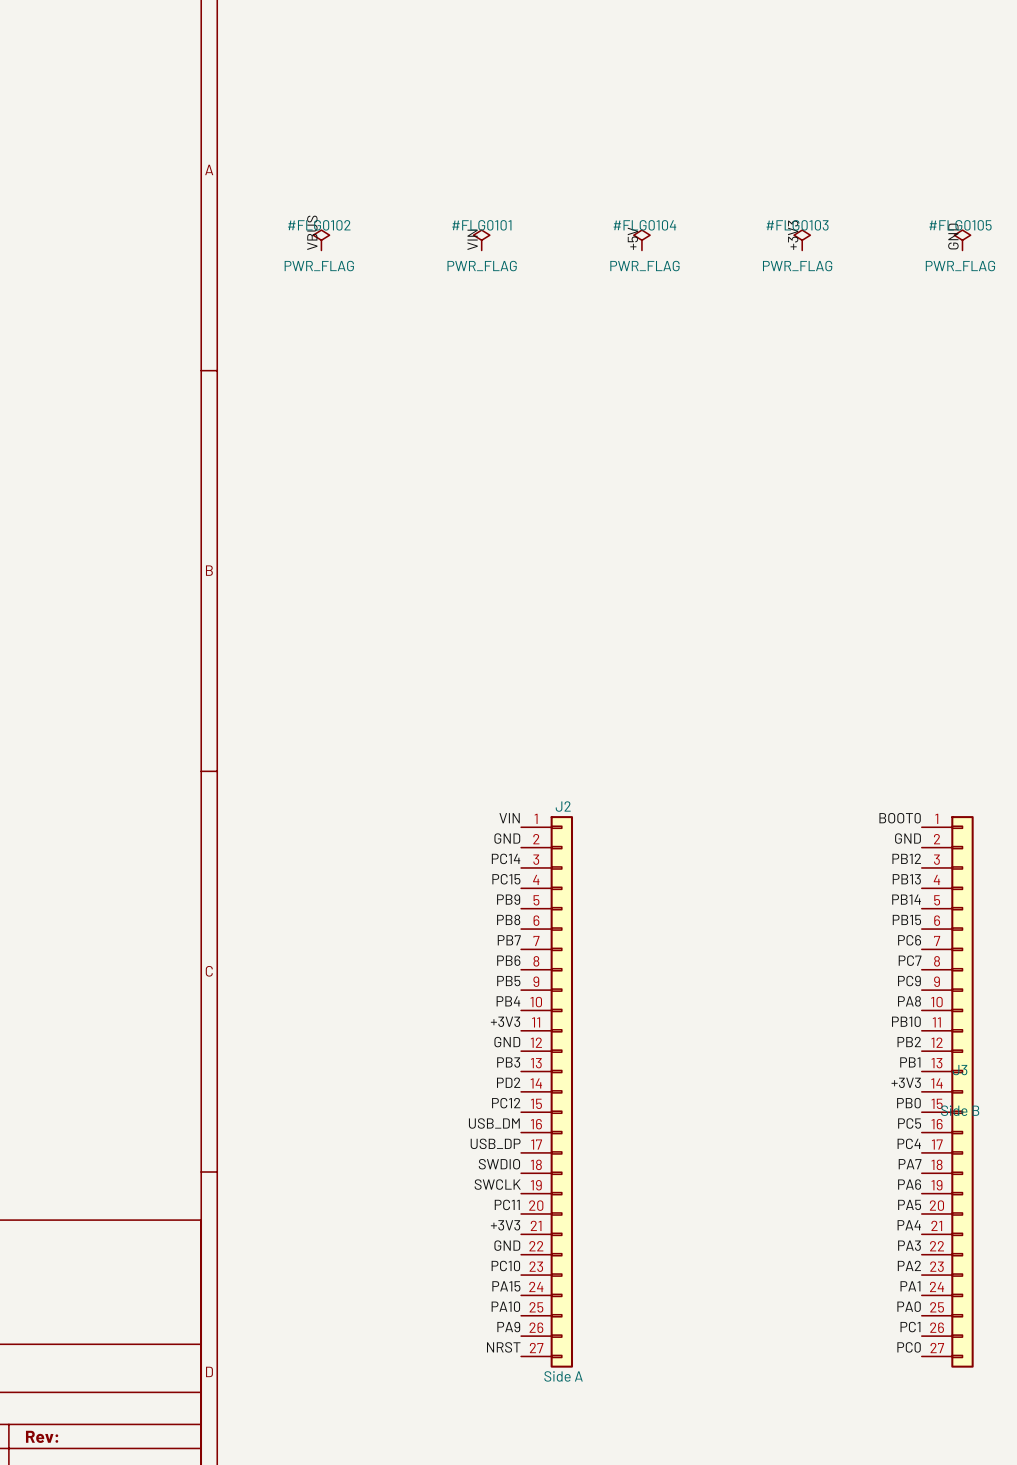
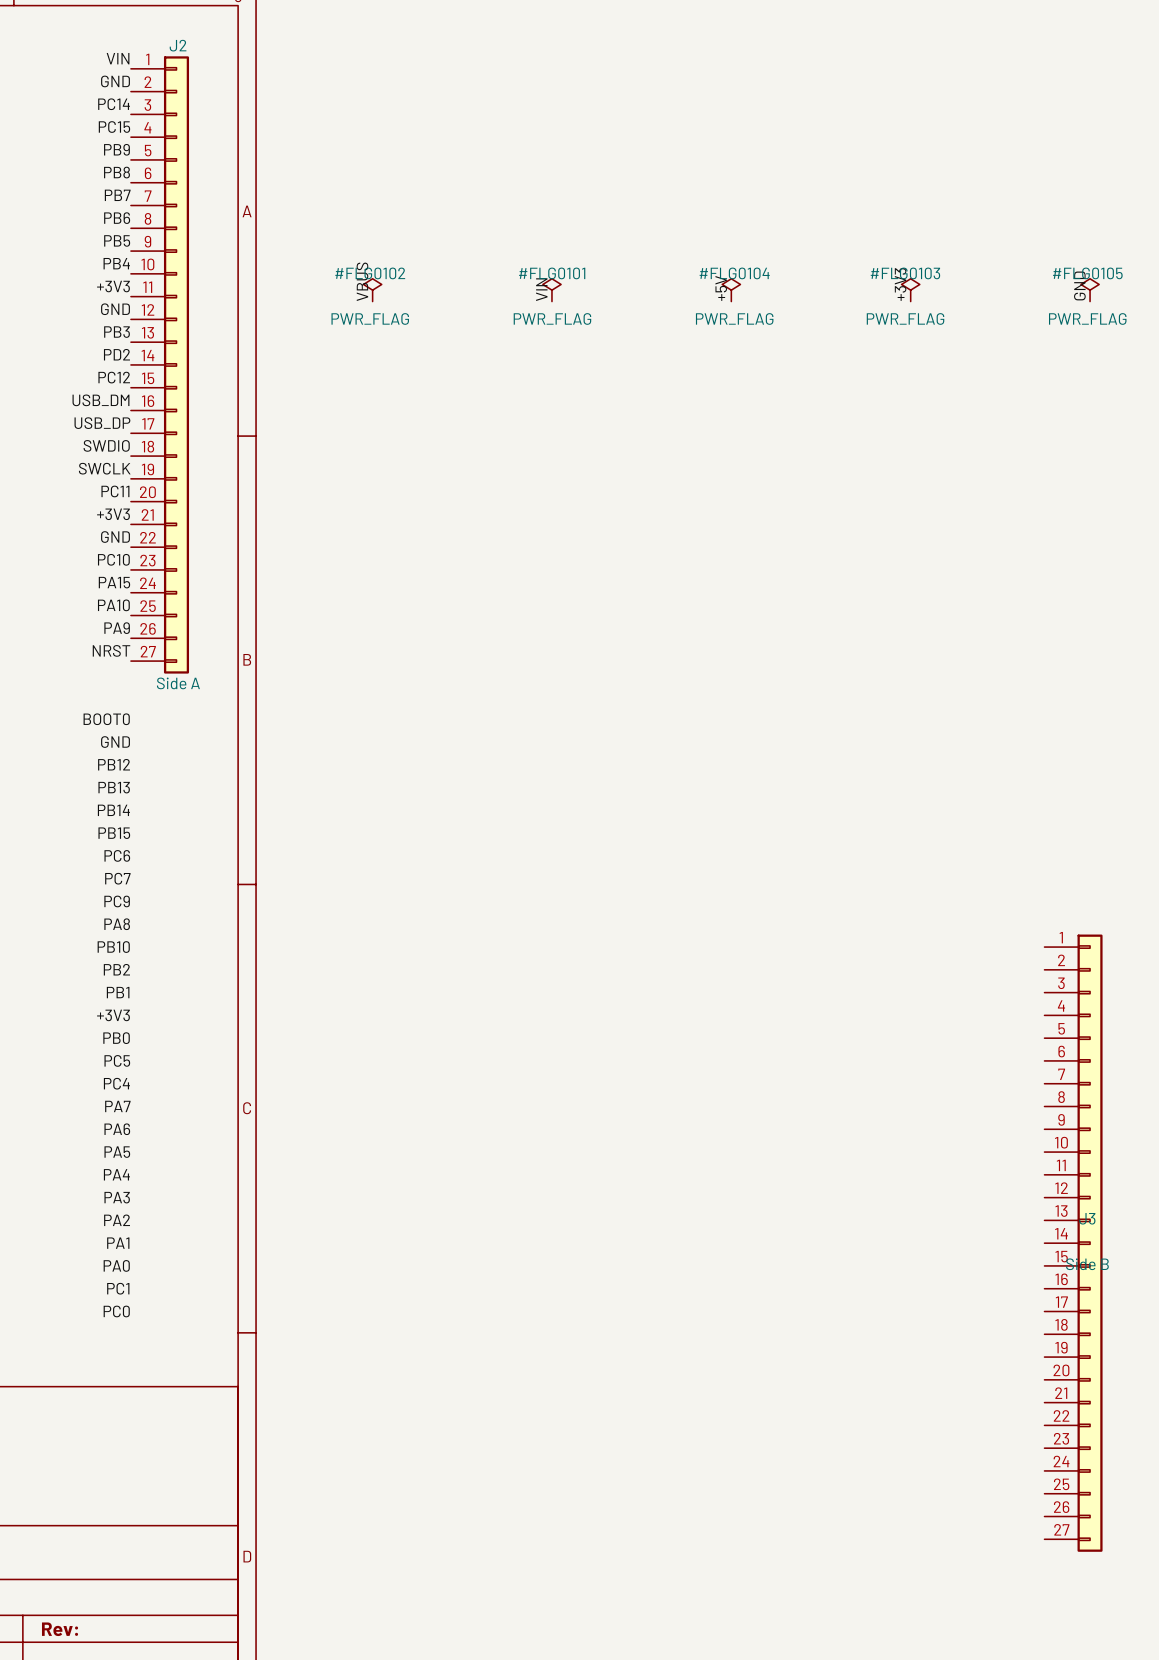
label: none -> VIN (118, 58)
label: none -> GND (115, 81)
label: none -> PC14 (114, 104)
label: none -> PC15 (114, 127)
label: none -> PB9 (116, 149)
label: none -> PB8 (116, 172)
label: none -> PB7 (117, 195)
label: none -> PB6 (117, 218)
label: none -> PB5 (117, 240)
label: none -> PB4 (116, 263)
label: none -> +3V3 (113, 286)
label: none -> GND (115, 309)
label: none -> PB3 (117, 332)
label: none -> PD2 (116, 354)
label: none -> PC12 (114, 377)
label: none -> USB_DM (100, 400)
label: none -> USB_DP (102, 423)
label: none -> SWDIO (106, 445)
label: none -> SWCLK (104, 468)
label: none -> PC11 (115, 491)
label: none -> +3V3 (113, 514)
label: none -> GND (115, 537)
label: none -> PC10 (113, 559)
label: none -> PA15 (114, 582)
label: none -> PA10 (113, 605)
label: none -> PA9 (117, 628)
label: none -> NRST (111, 650)
label: none -> BOOT0 (106, 719)
label: none -> GND (115, 742)
label: none -> PB12 (114, 764)
label: none -> PB13 (114, 787)
label: none -> PB14 (113, 810)
label: none -> PB15 (114, 833)
label: none -> PC6 (117, 855)
label: none -> PC7 (117, 878)
label: none -> PC9 (117, 901)
label: none -> PA8 (117, 924)
label: VIN (509, 818) -> none
label: BOOT0 (900, 818) -> none
label: none -> PB10 (113, 947)
label: GND (507, 838) -> none
label: GND (907, 838) -> none
label: none -> PB2 (116, 969)
label: PC14 (506, 858) -> none
label: PB12 (906, 858) -> none
label: none -> PB1 (118, 992)
label: PC15 (506, 879) -> none
label: PB13 (906, 879) -> none
label: none -> +3V3 (113, 1015)
label: PB9 (508, 899) -> none
label: PB14 (906, 899) -> none
label: none -> PB0 (116, 1038)
label: PB8 (508, 919) -> none
label: PB15 (906, 920) -> none
label: none -> PC5 (117, 1060)
label: PB7 (509, 940) -> none
label: PC6 (909, 940) -> none
label: none -> PC4 (116, 1083)
label: PB6 (508, 960) -> none
label: PC7 (910, 960) -> none
label: none -> PA7 (117, 1106)
label: PB5 (508, 981) -> none
label: PC9 (909, 981) -> none
label: none -> PA6 (117, 1129)
label: PB4 (508, 1001) -> none
label: PA8 (909, 1001) -> none
label: none -> PA5 (117, 1152)
label: +3V3 (505, 1021) -> none
label: PB10 (906, 1021) -> none
label: none -> PA4 (116, 1174)
label: GND (507, 1042) -> none
label: PB2 (909, 1042) -> none
label: none -> PA3 (117, 1197)
label: PB3 (508, 1062) -> none
label: PB1 (910, 1062) -> none
label: none -> PA2 (117, 1220)
label: PD2 (508, 1082) -> none
label: +3V3 (906, 1082) -> none
label: none -> PA1 (118, 1243)
J2 position: (547, 1091) -> (159, 364)
label: PC12 (506, 1103) -> none
label: PB0 (908, 1103) -> none
label: none -> PA0 (116, 1265)
label: USB_DM (494, 1123) -> none
label: PC5 (909, 1123) -> none
label: none -> PC1 (118, 1288)
label: USB_DP (495, 1143) -> none
label: PC4 (909, 1143) -> none
label: none -> PC0 (116, 1311)
label: SWDIO (499, 1164) -> none
label: PA7 (910, 1164) -> none
label: SWCLK (497, 1184) -> none
label: PA6 (909, 1184) -> none
label: PC11 (507, 1204) -> none
label: PA5 (909, 1204) -> none
label: +3V3 (505, 1225) -> none
label: PA4 (909, 1225) -> none
label: GND (507, 1245) -> none
label: PA3 (909, 1245) -> none
label: PC10 (505, 1265) -> none
label: PA2 (909, 1265) -> none
label: PA15 (506, 1286) -> none
label: PA1 (910, 1286) -> none
label: PA10 (505, 1306) -> none
label: PA0 (909, 1306) -> none
label: PA9 (508, 1327) -> none
label: PC1 (910, 1327) -> none
label: NRST (503, 1347) -> none
label: PC0 (909, 1347) -> none

